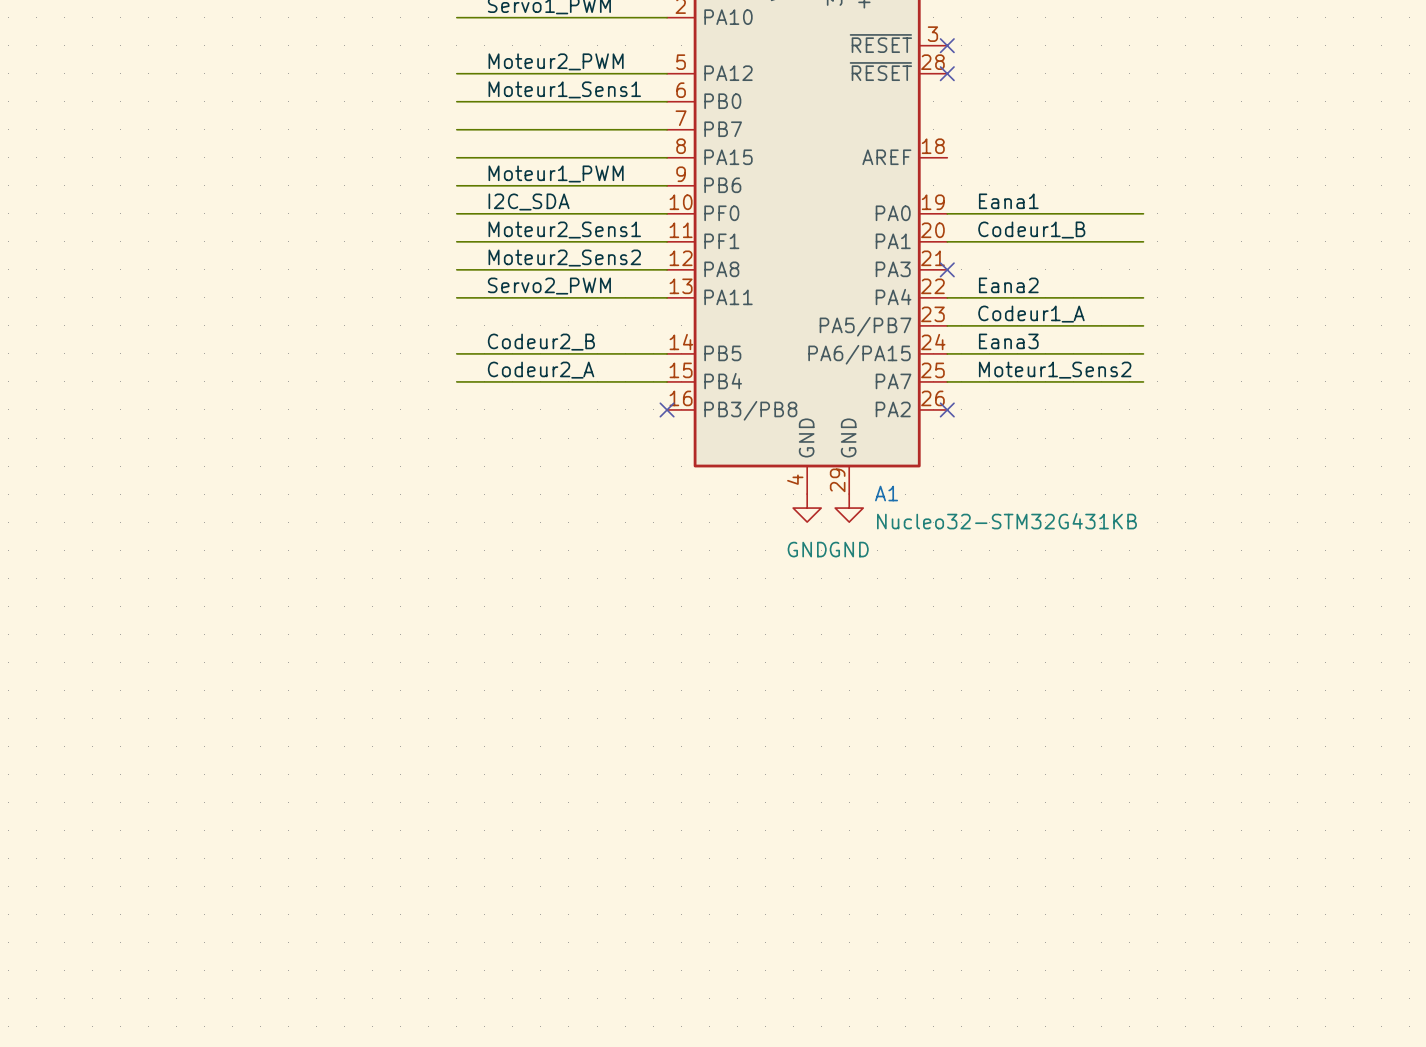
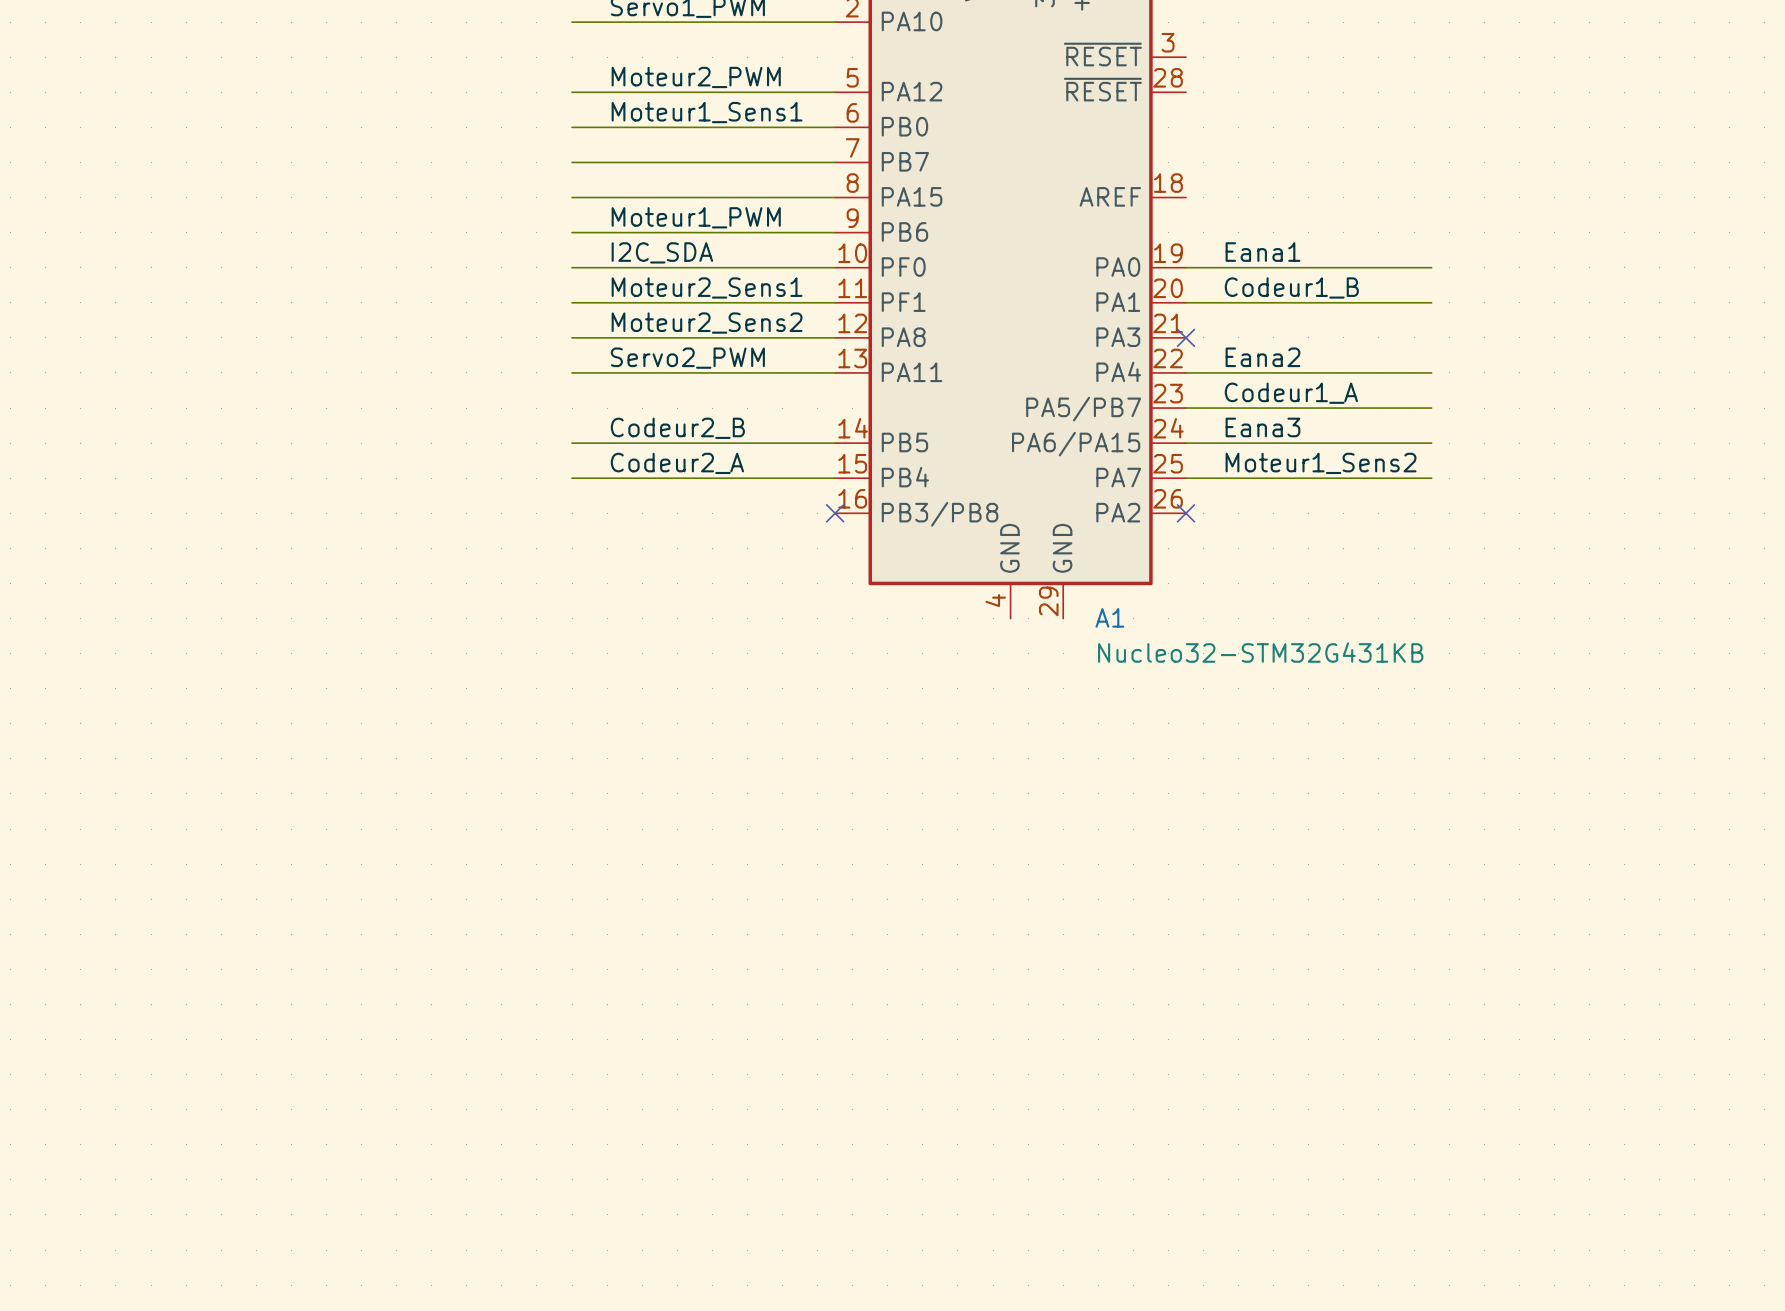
no-connect mark: (947, 45) -> none
no-connect mark: (947, 73) -> none
power symbol: GND (807, 508) -> none
power symbol: GND (849, 508) -> none

